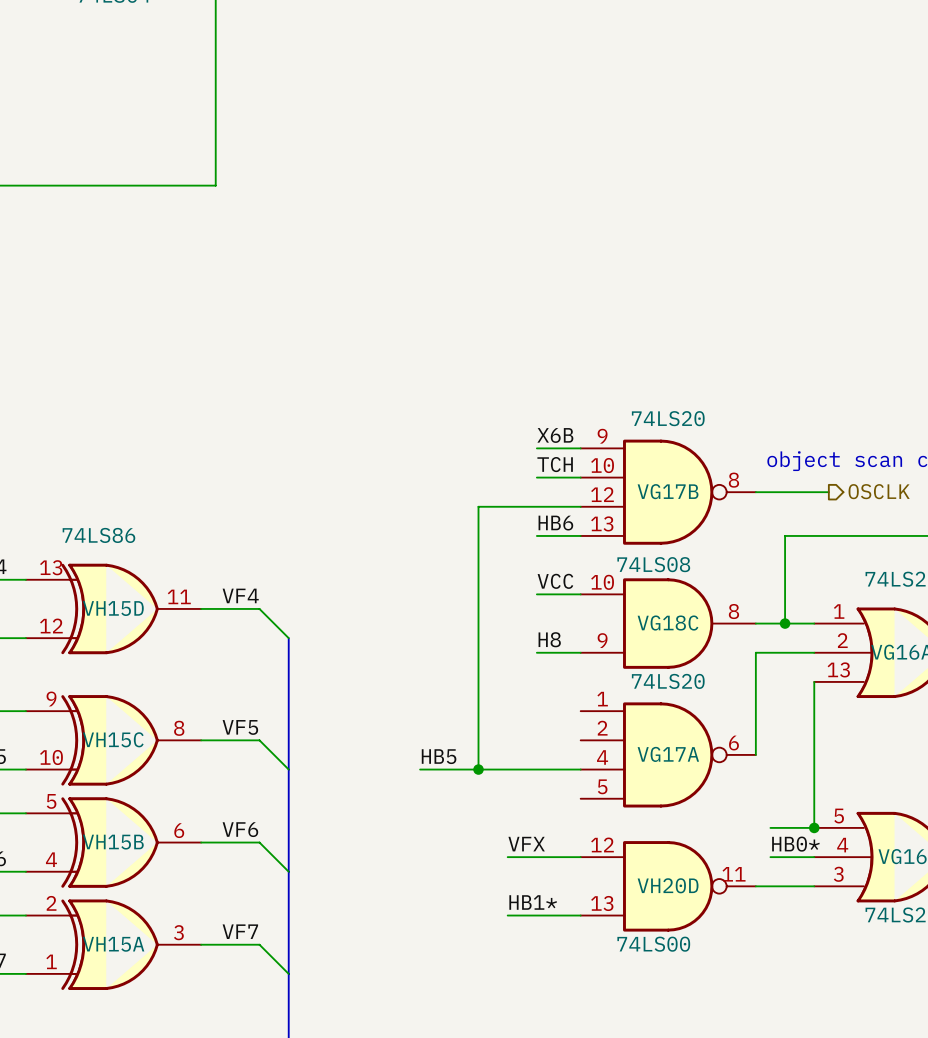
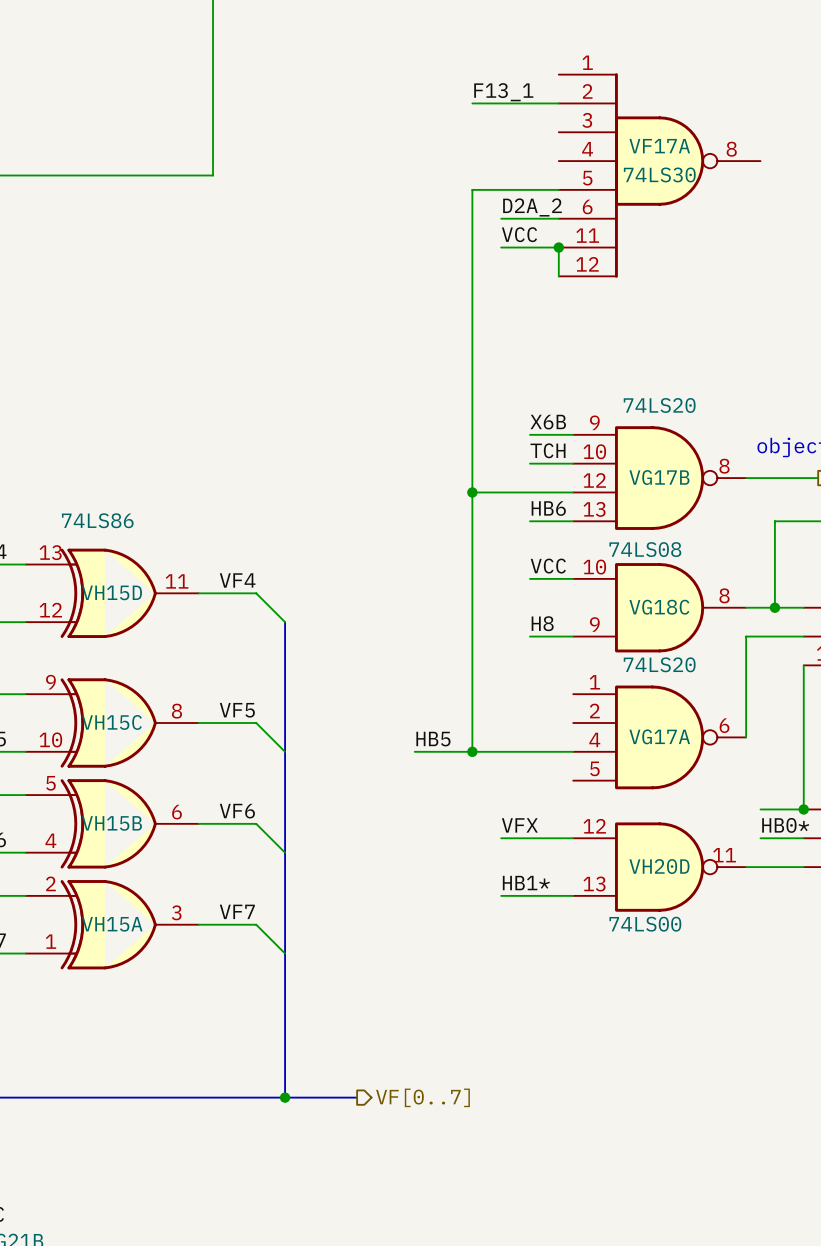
label: none -> F13_1 (503, 92)
wire: none -> (472, 103) (558, 103)
VF17A: none -> 74LS30 (659, 175)
wire: none -> (558, 189) (472, 189) (472, 492)
label: none -> D2A_2 (532, 207)
wire: none -> (501, 218) (558, 218)
label: none -> VCC (519, 234)
wire: none -> (501, 247) (558, 247) (558, 276)
junction: none -> (558, 247)
junction: none -> (472, 492)

